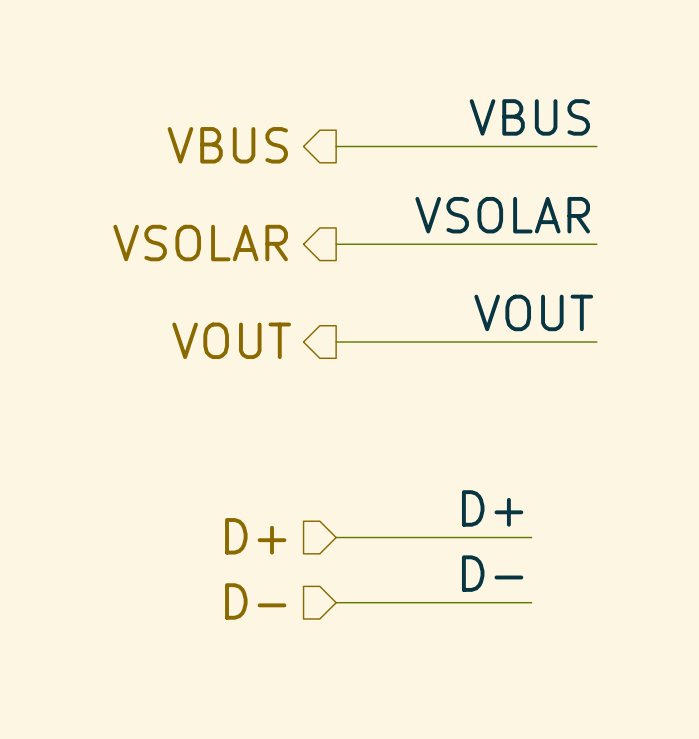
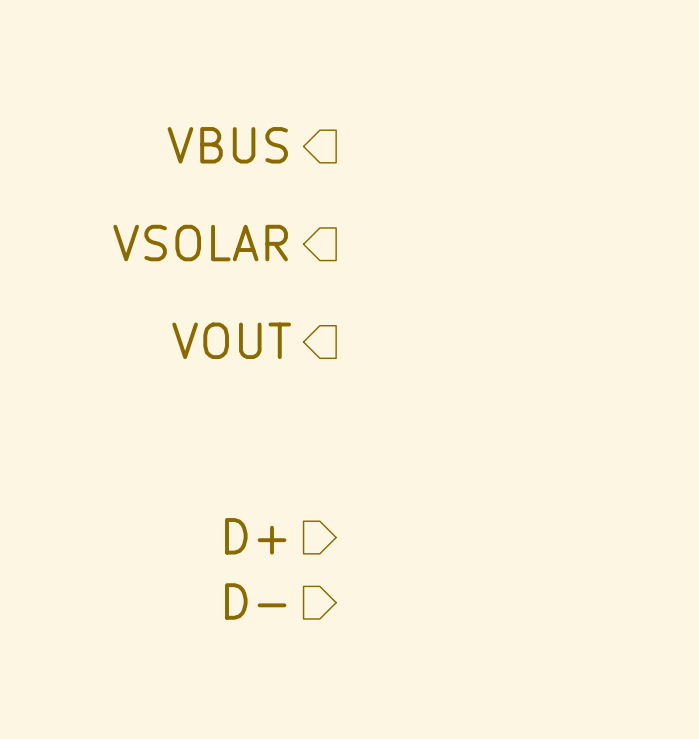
label: VBUS (529, 117) -> none
wire: (336, 146) (596, 146) -> none
label: VSOLAR (502, 215) -> none
wire: (336, 244) (596, 244) -> none
label: VOUT (533, 312) -> none
wire: (336, 342) (596, 342) -> none
label: D+ (492, 508) -> none
wire: (336, 537) (531, 537) -> none
label: D- (492, 573) -> none
wire: (336, 602) (531, 602) -> none

